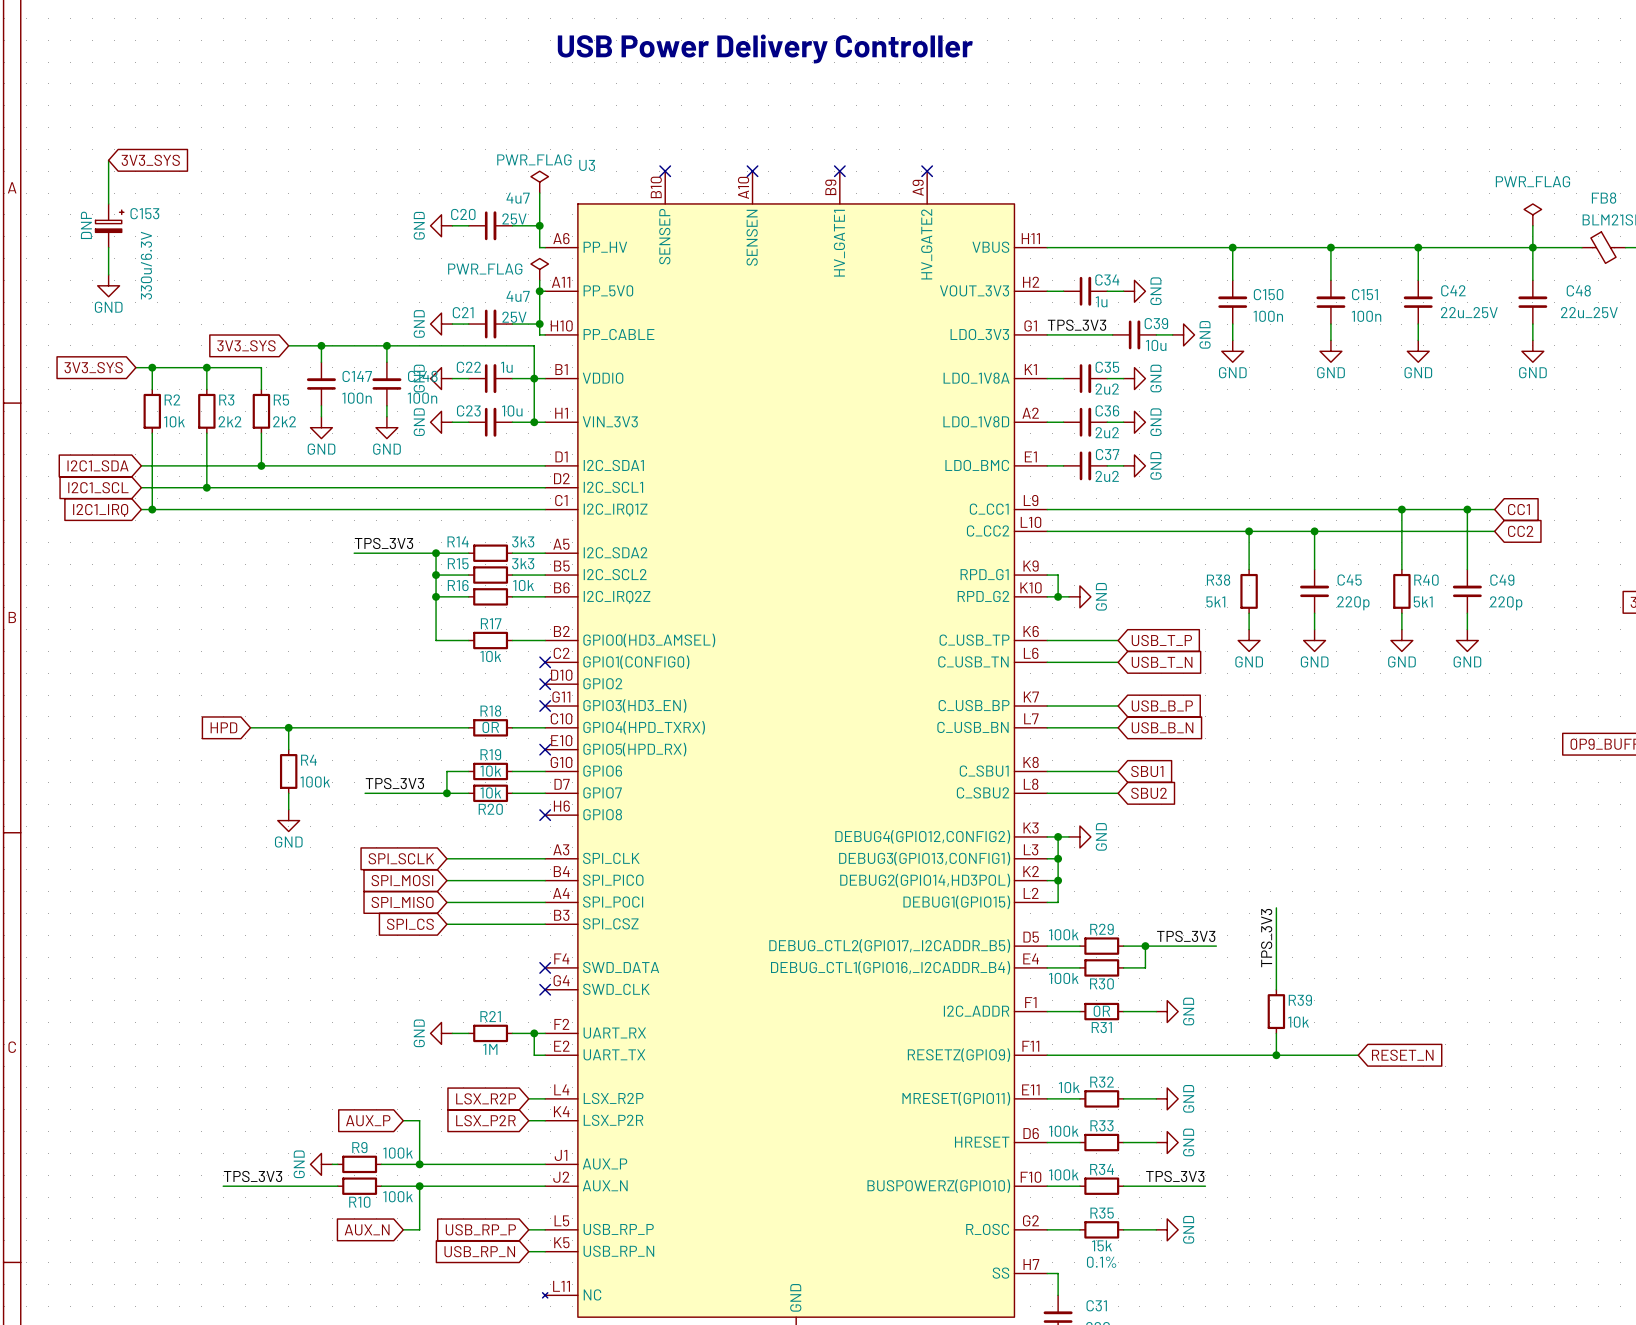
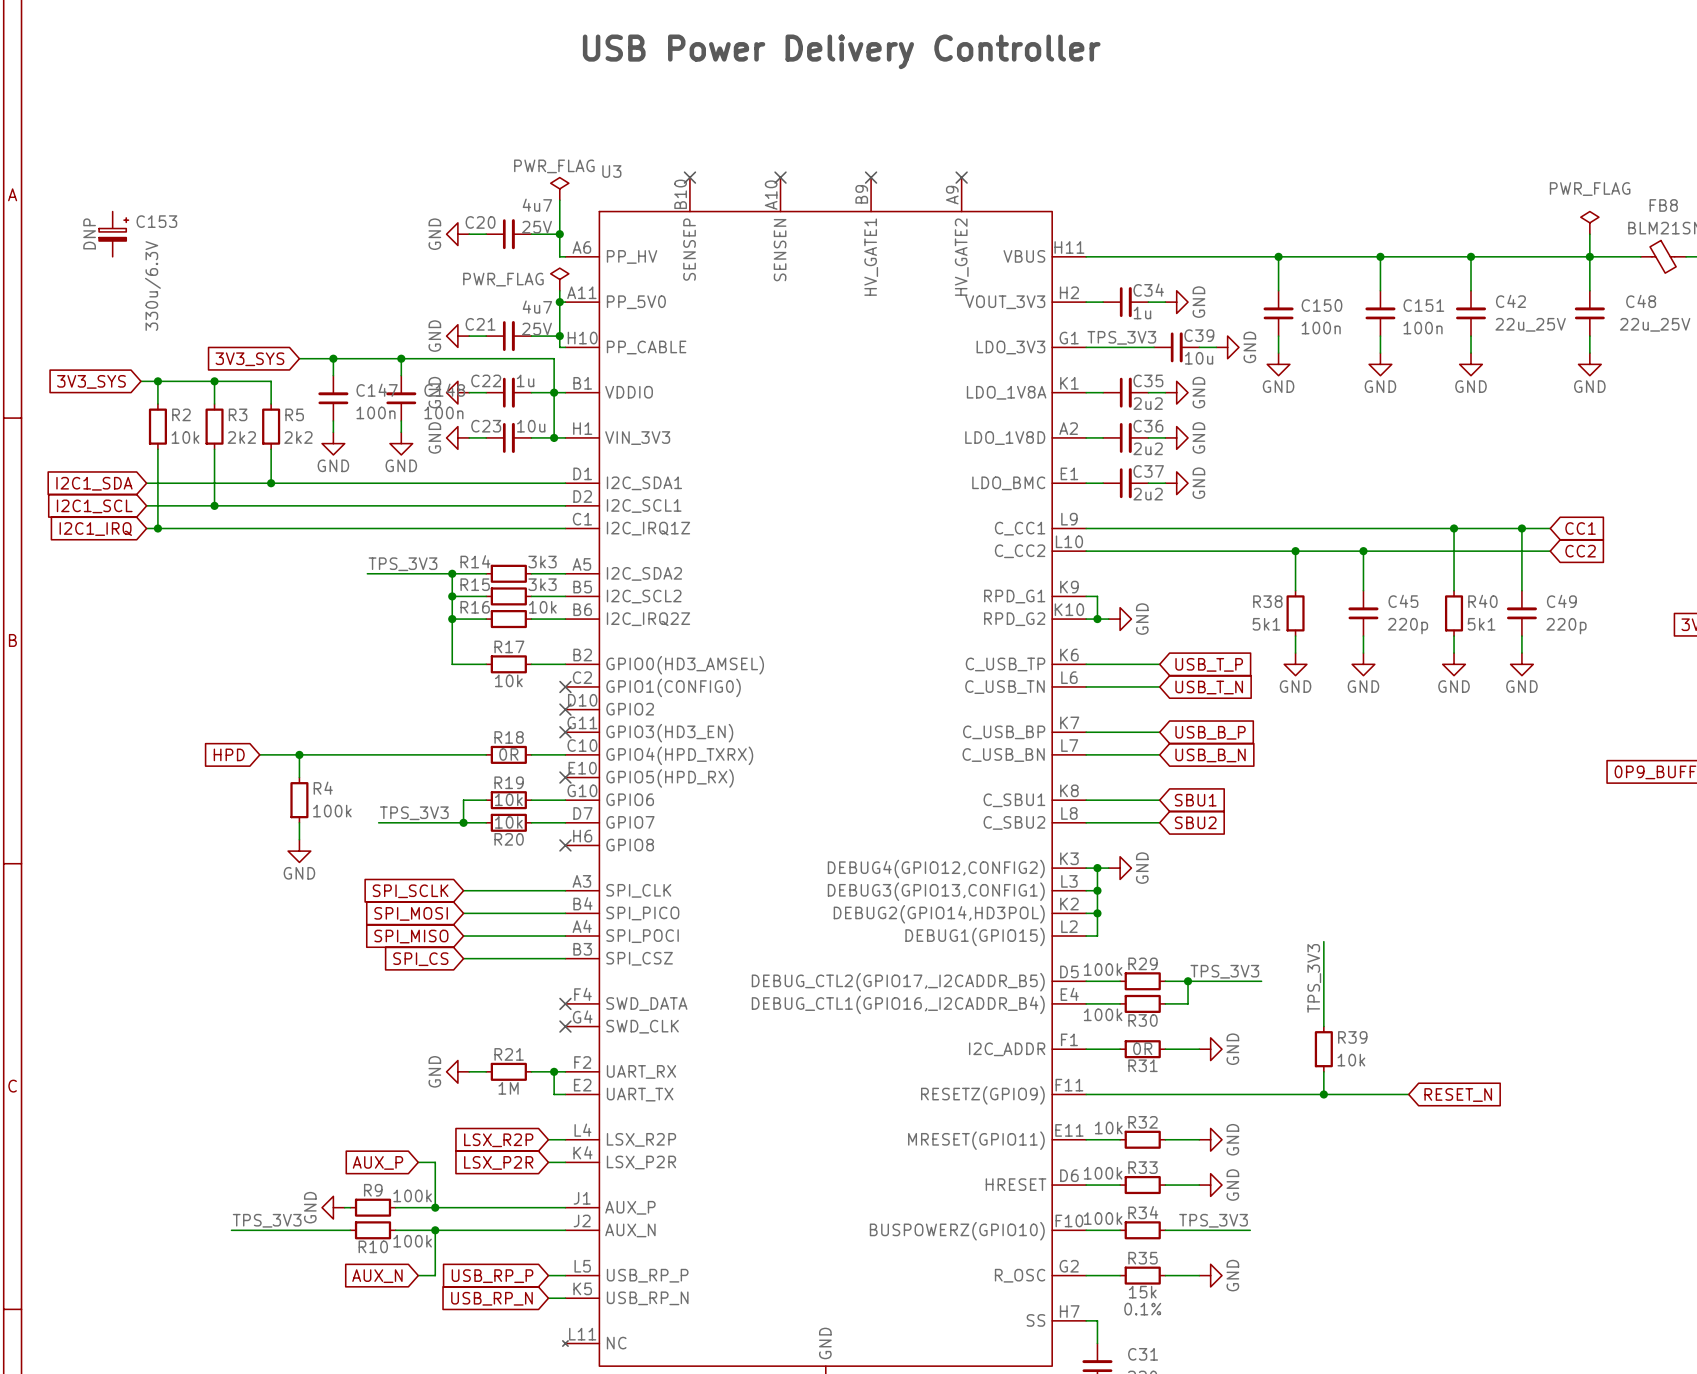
wire: (108, 160) (108, 203) -> none
global label: 3V3_SYS (150, 160) -> none
wire: (108, 247) (108, 274) -> none
power symbol: GND (108, 285) -> none

